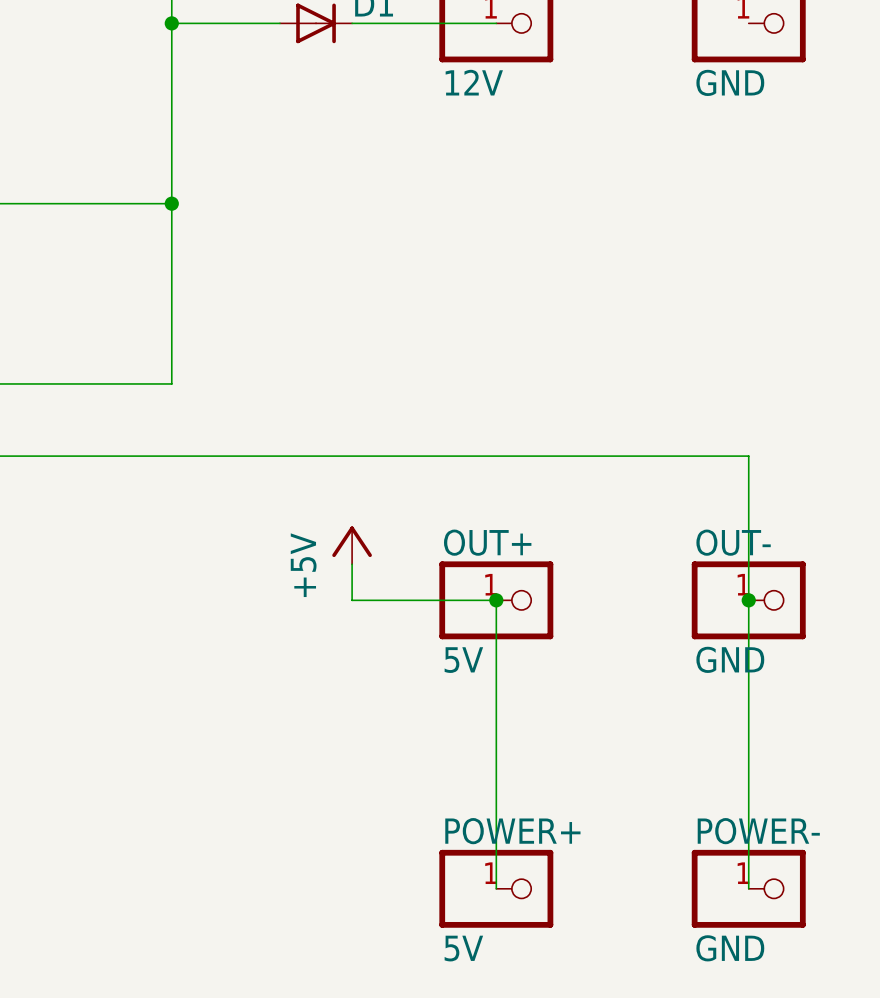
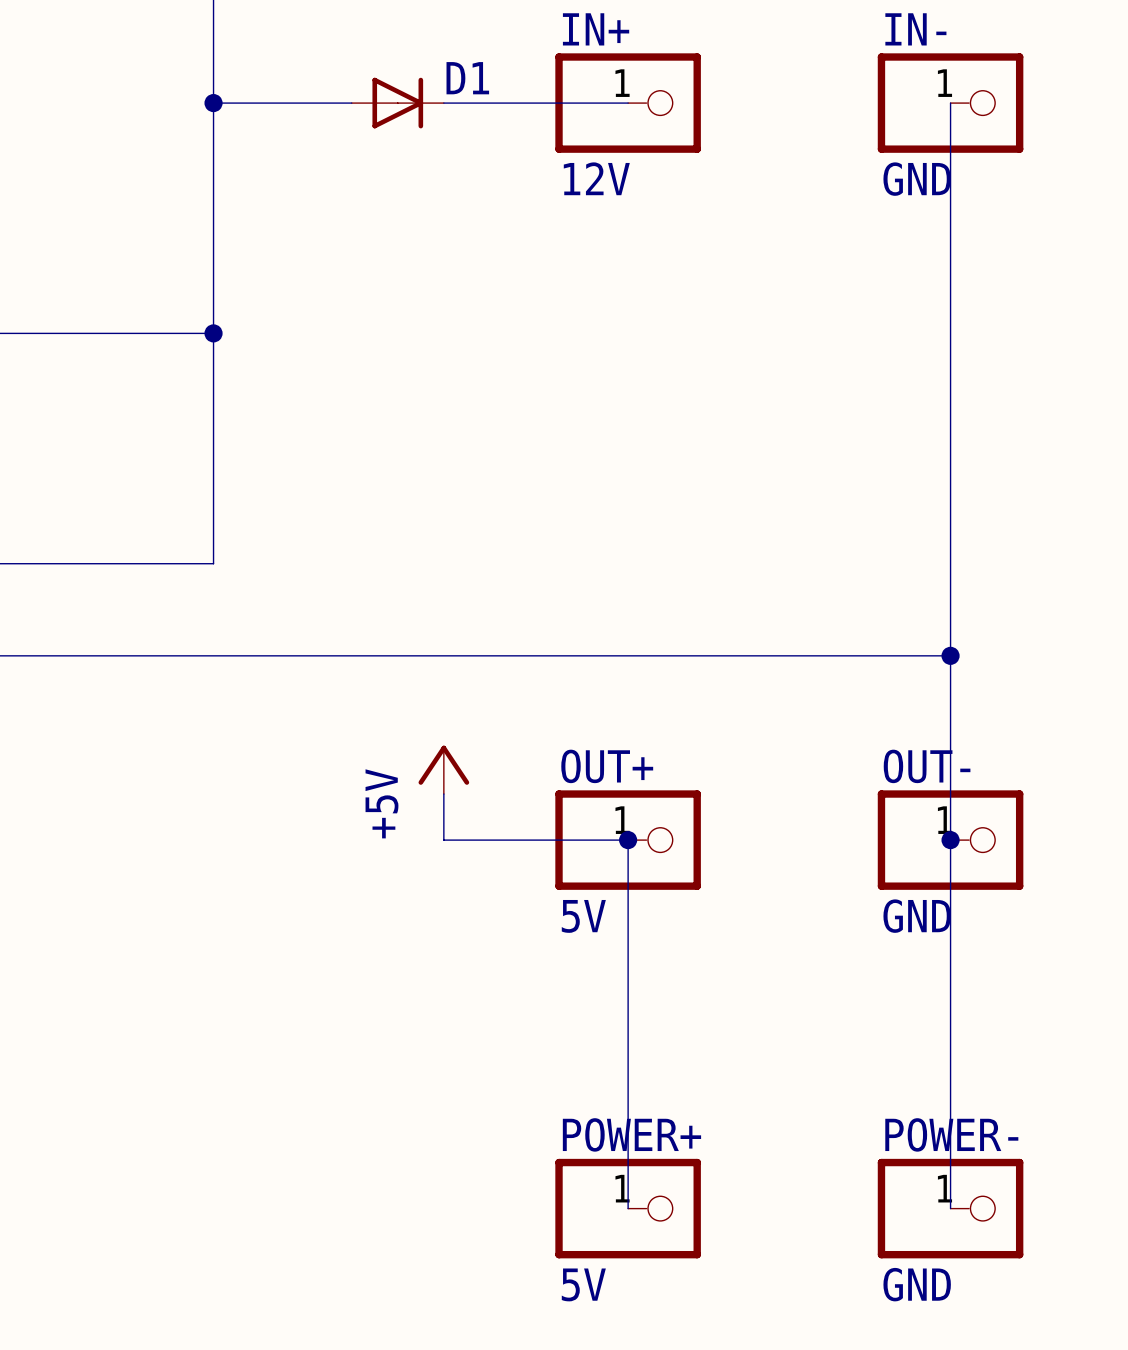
wire: none -> (950, 103) (950, 655)
junction: none -> (950, 655)

